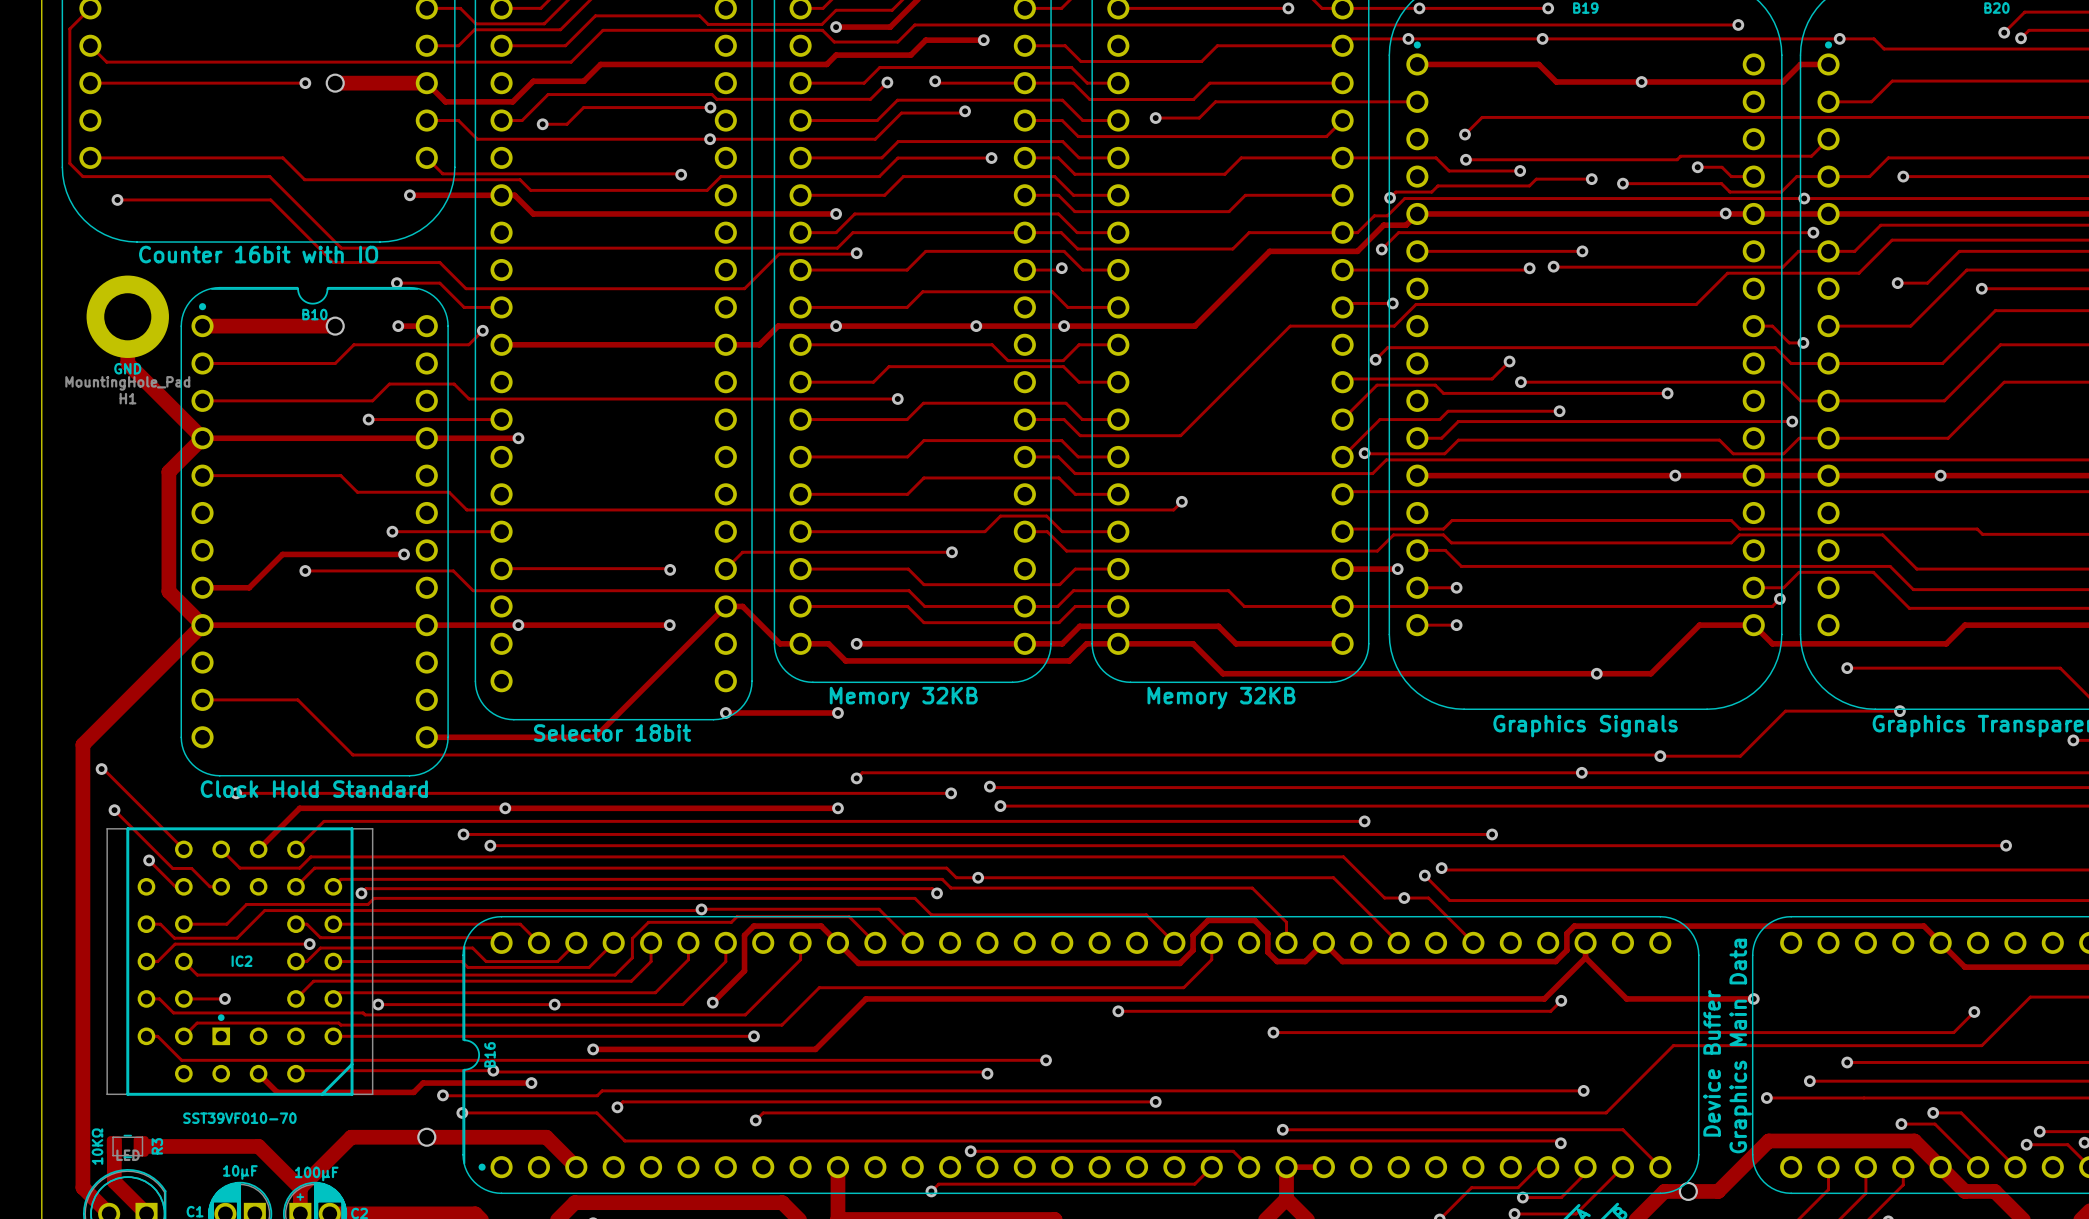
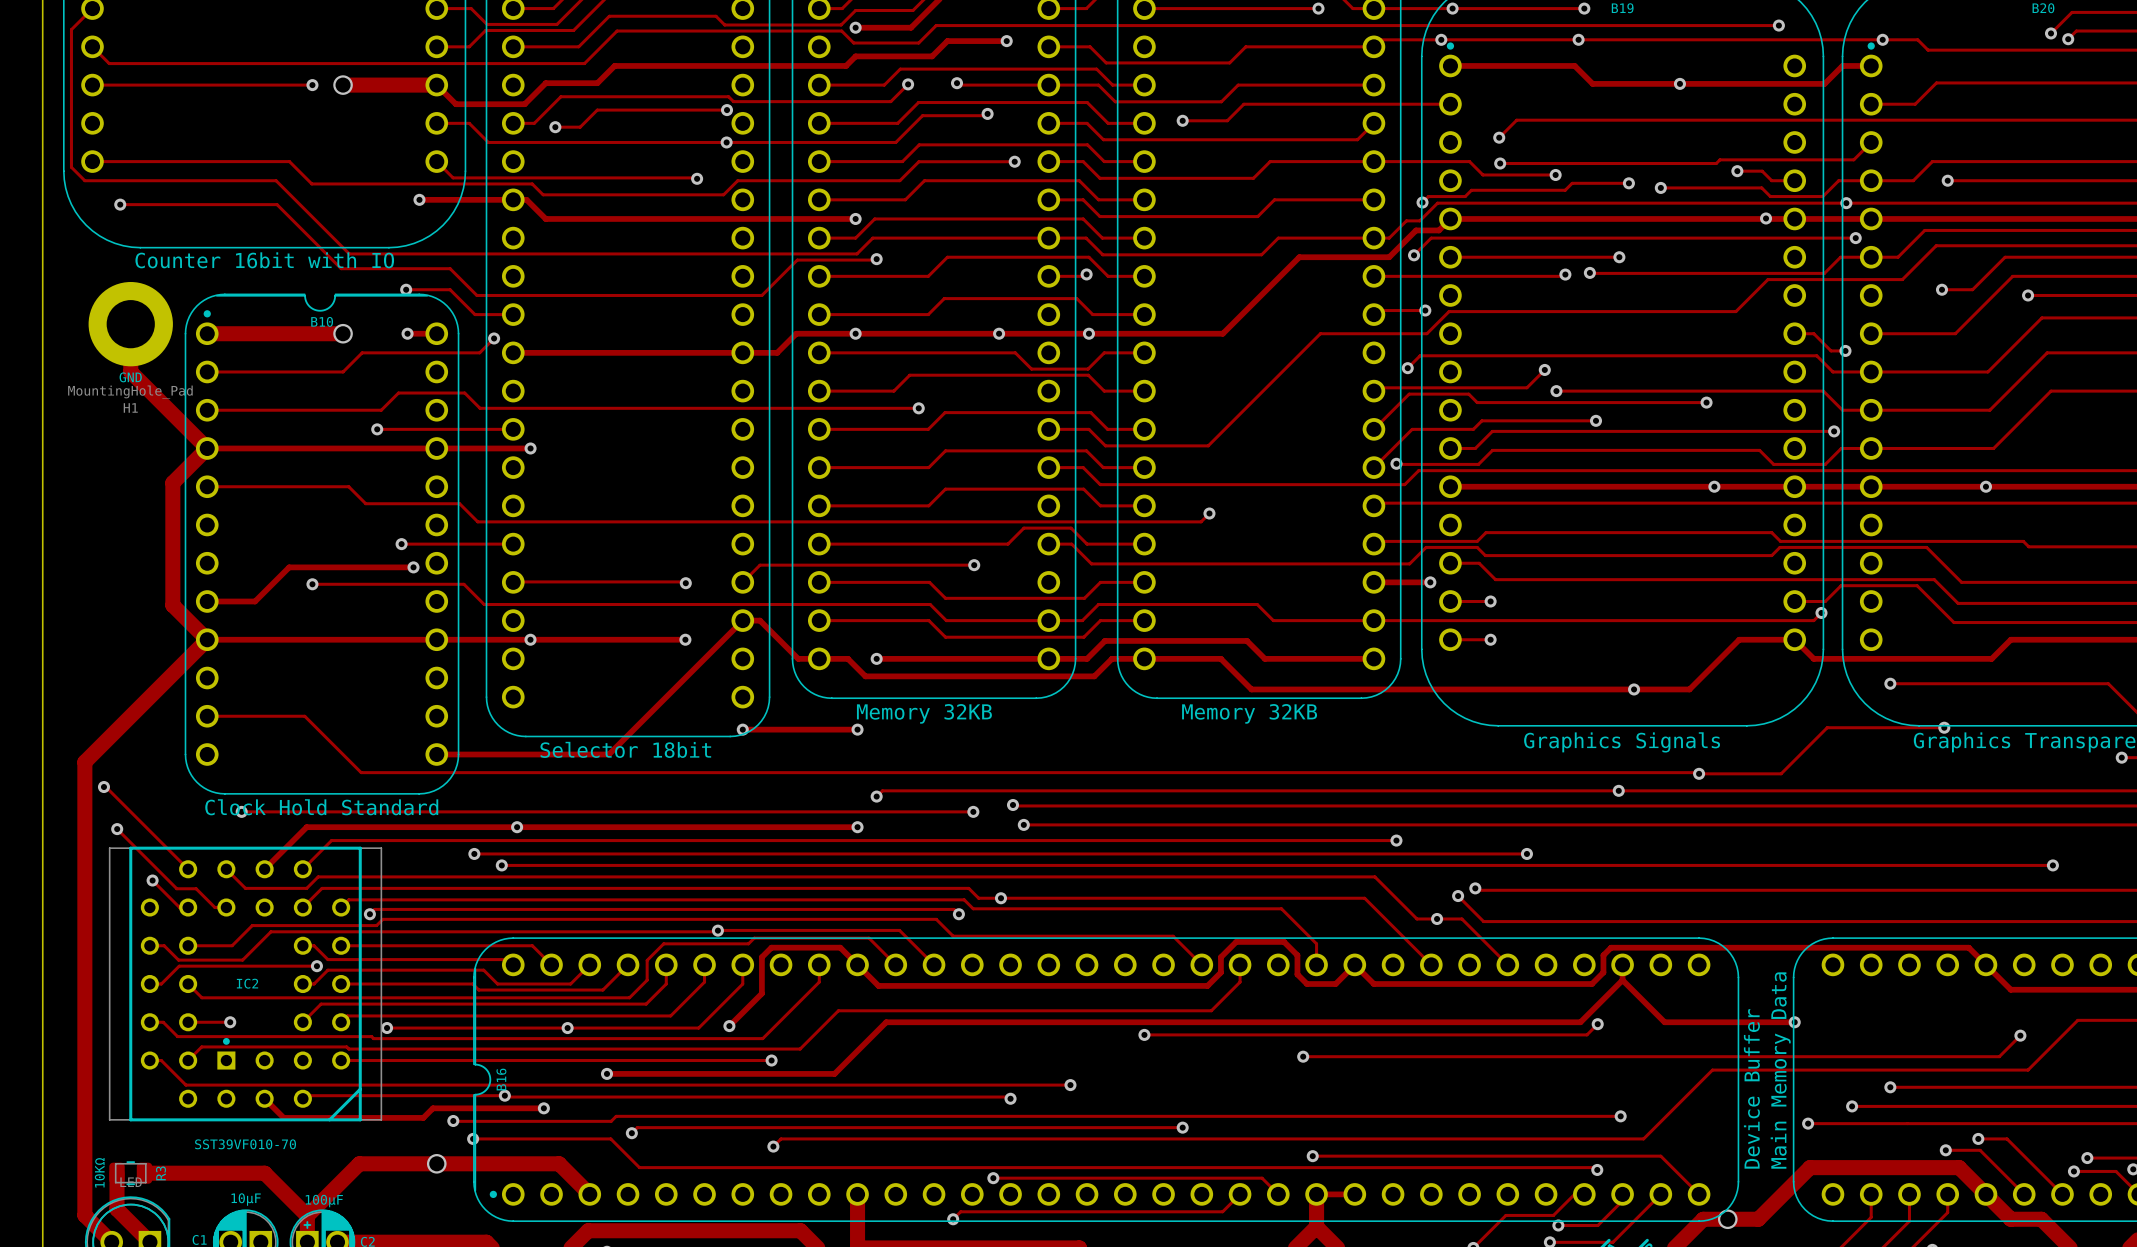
part text: Graphics Main Data (1740, 1046) -> Main Memory Data (1780, 1070)

